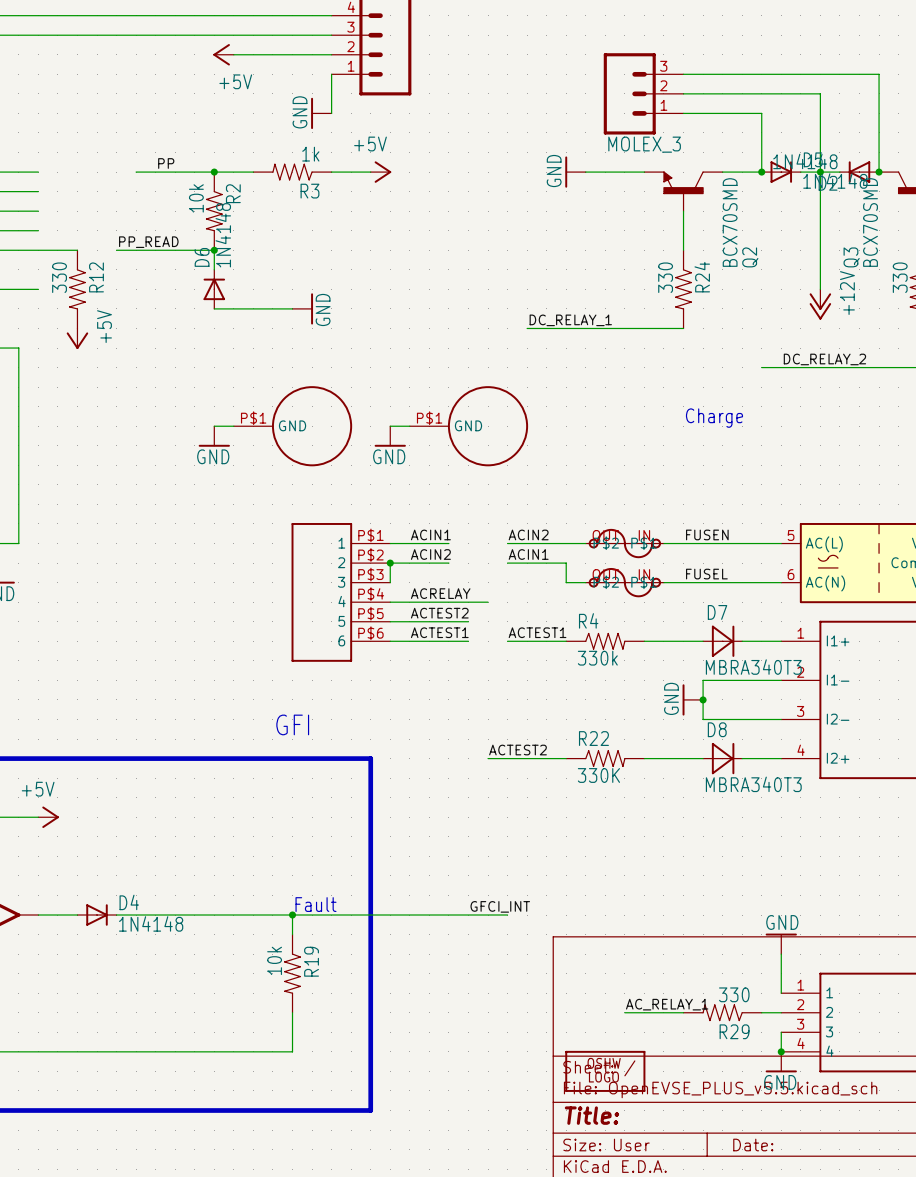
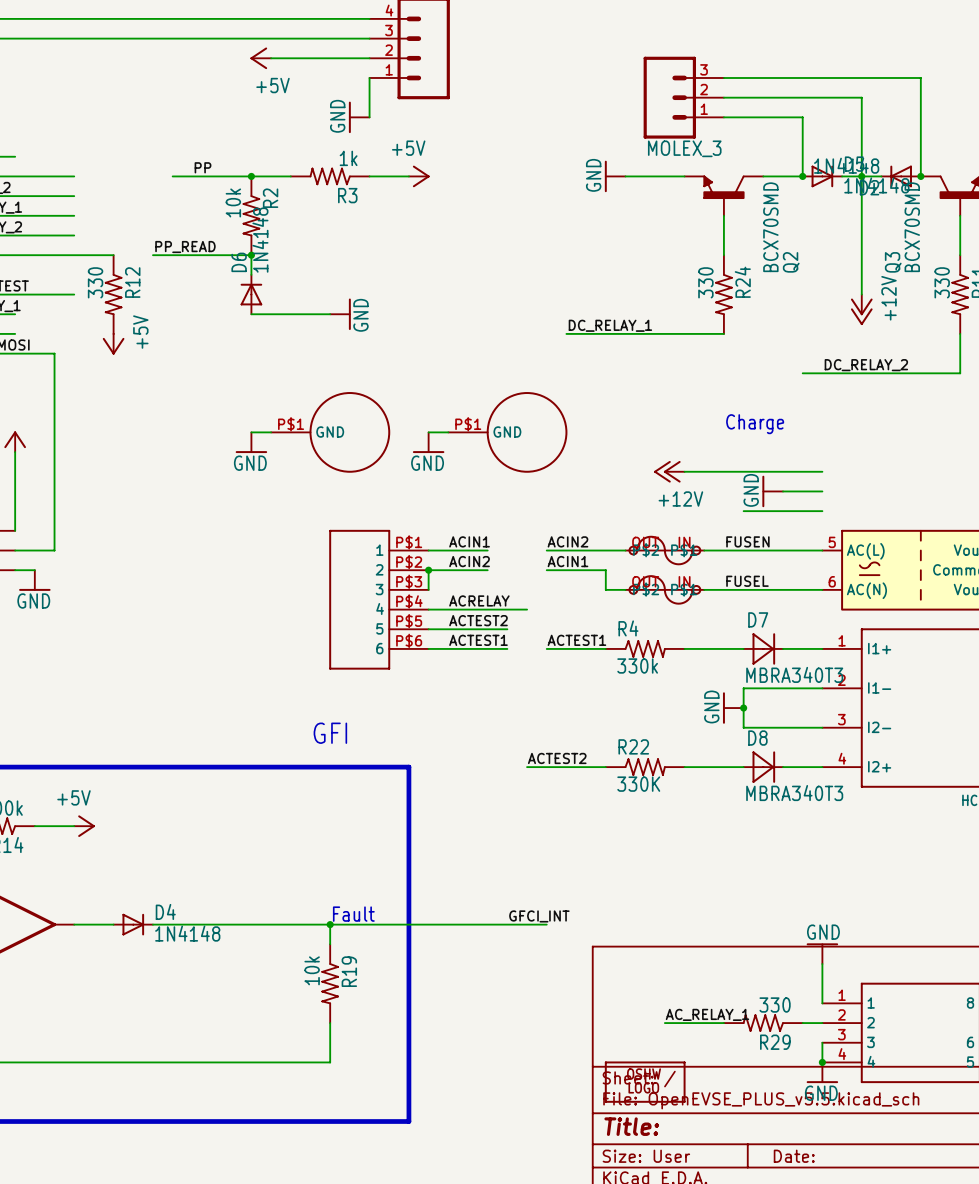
power symbol: none -> +12V (669, 471)
wire: none -> (684, 471) (822, 471)
power symbol: none -> GND (772, 491)
wire: none -> (783, 491) (822, 491)
wire: none -> (743, 511) (822, 511)

